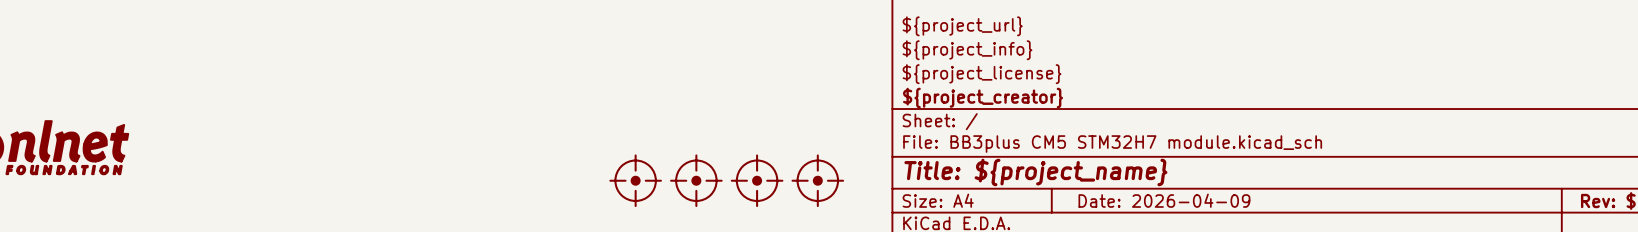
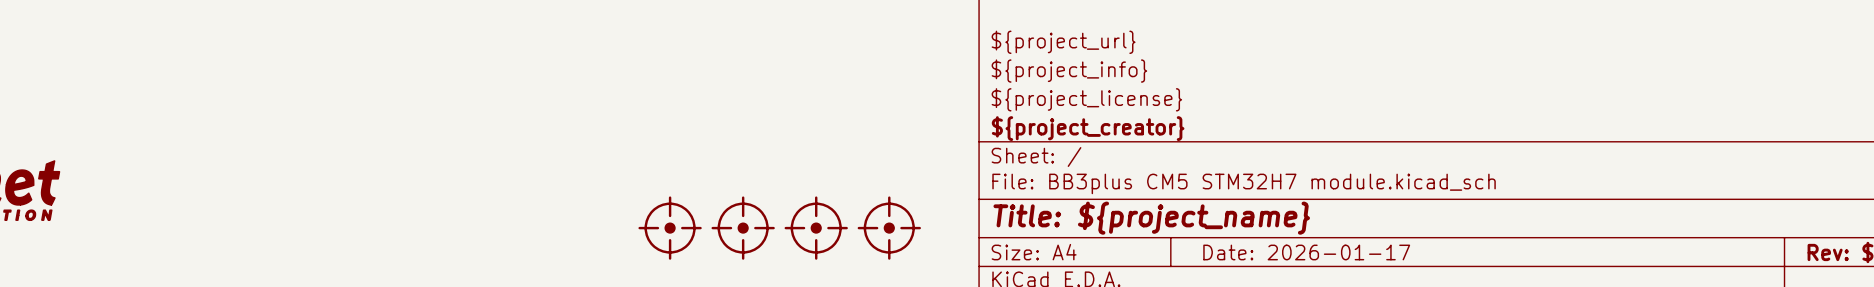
title block: Date: 2026-04-09 (1164, 200) -> Date: 2026-01-17 (1306, 252)

